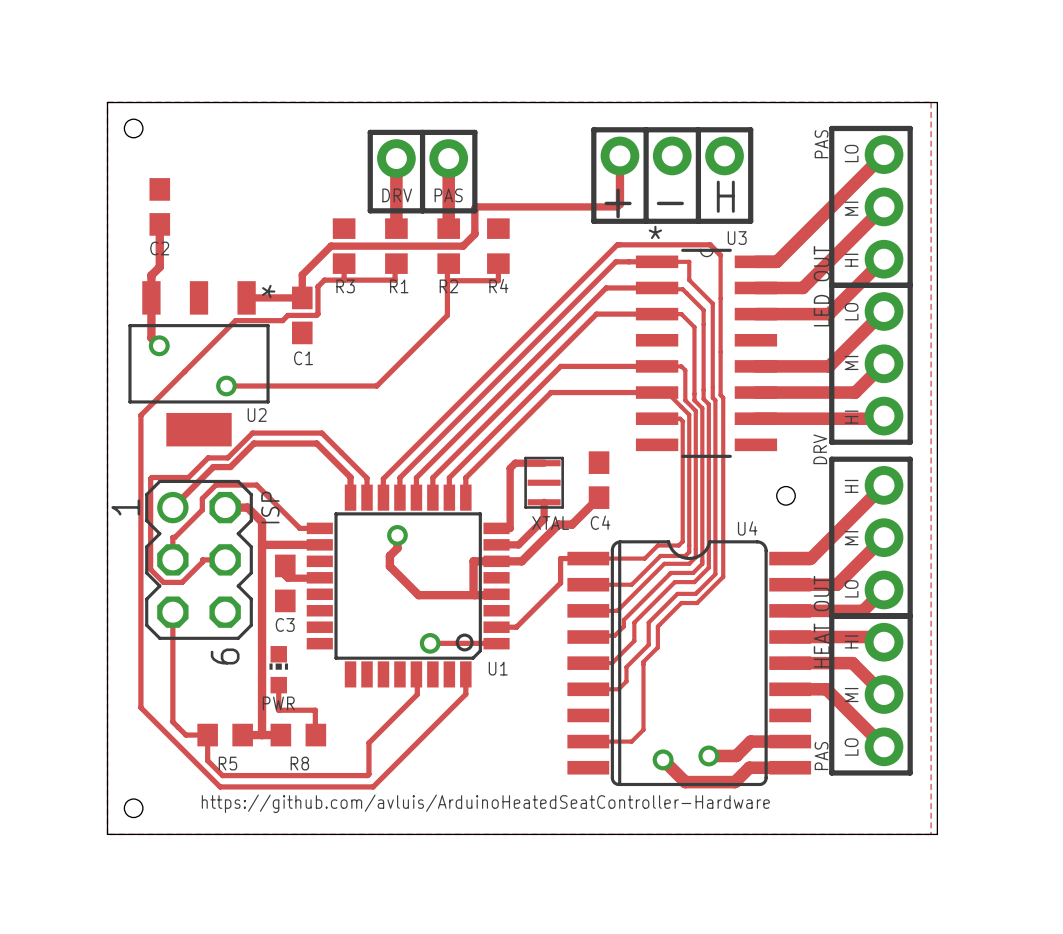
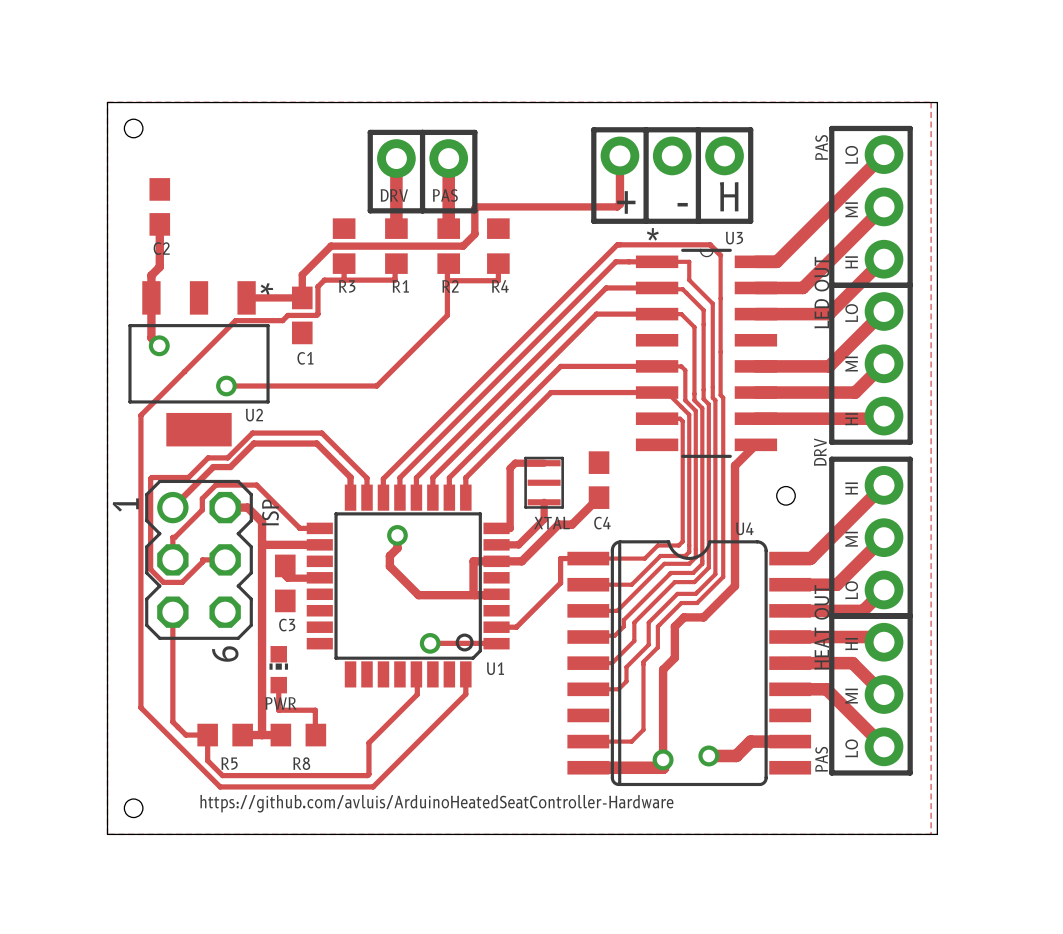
track: none -> (755, 444) (735, 465) (735, 586) (703, 617) (684, 617) (674, 626) (674, 657) (663, 669) (663, 767) (588, 767)
track: (663, 759) (685, 782) (735, 782) (749, 767) (790, 767) -> none

